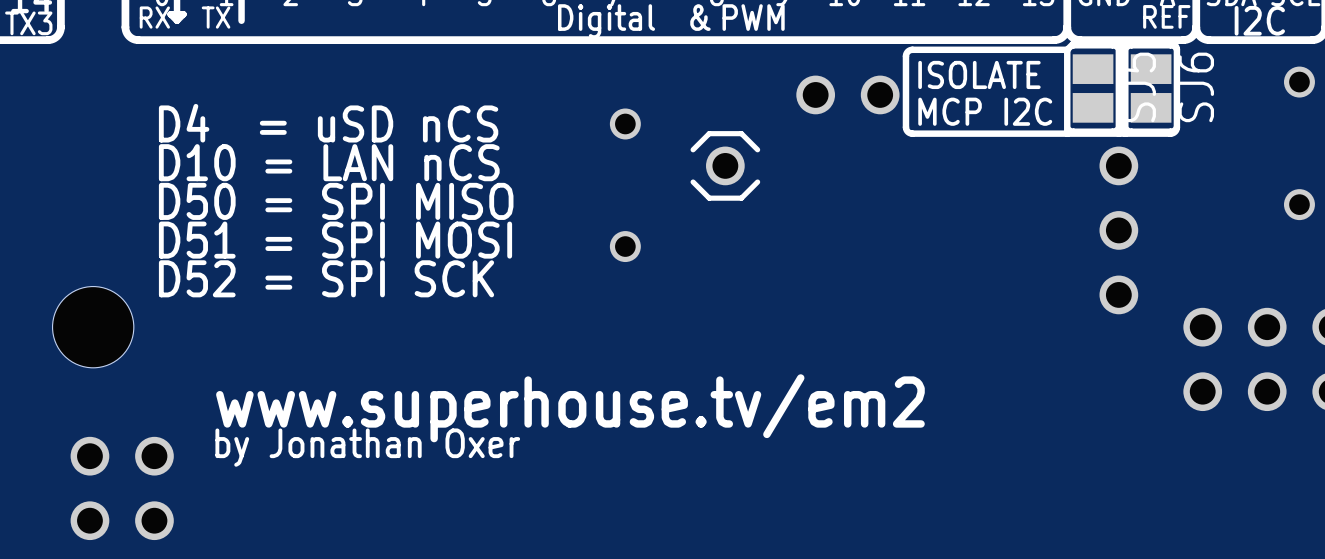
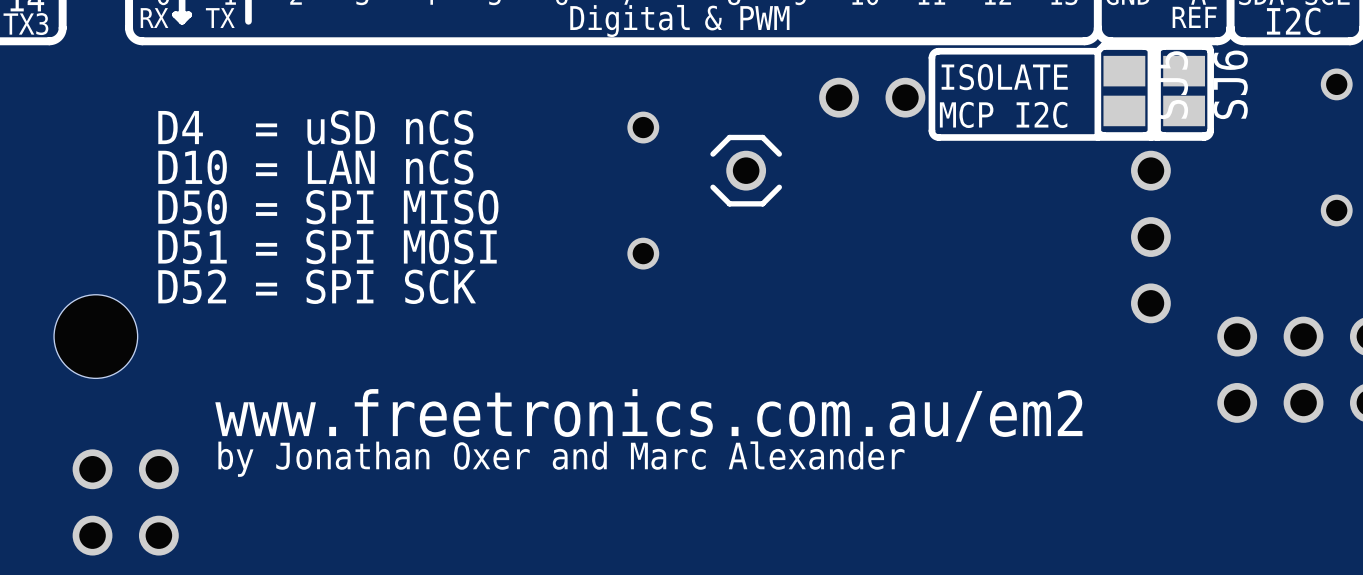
text: www.superhouse.tv/em2 (570, 408) -> www.freetronics.com.au/em2 (648, 415)
text: by Jonathan Oxer (367, 447) -> by Jonathan Oxer and Marc Alexander (561, 459)

